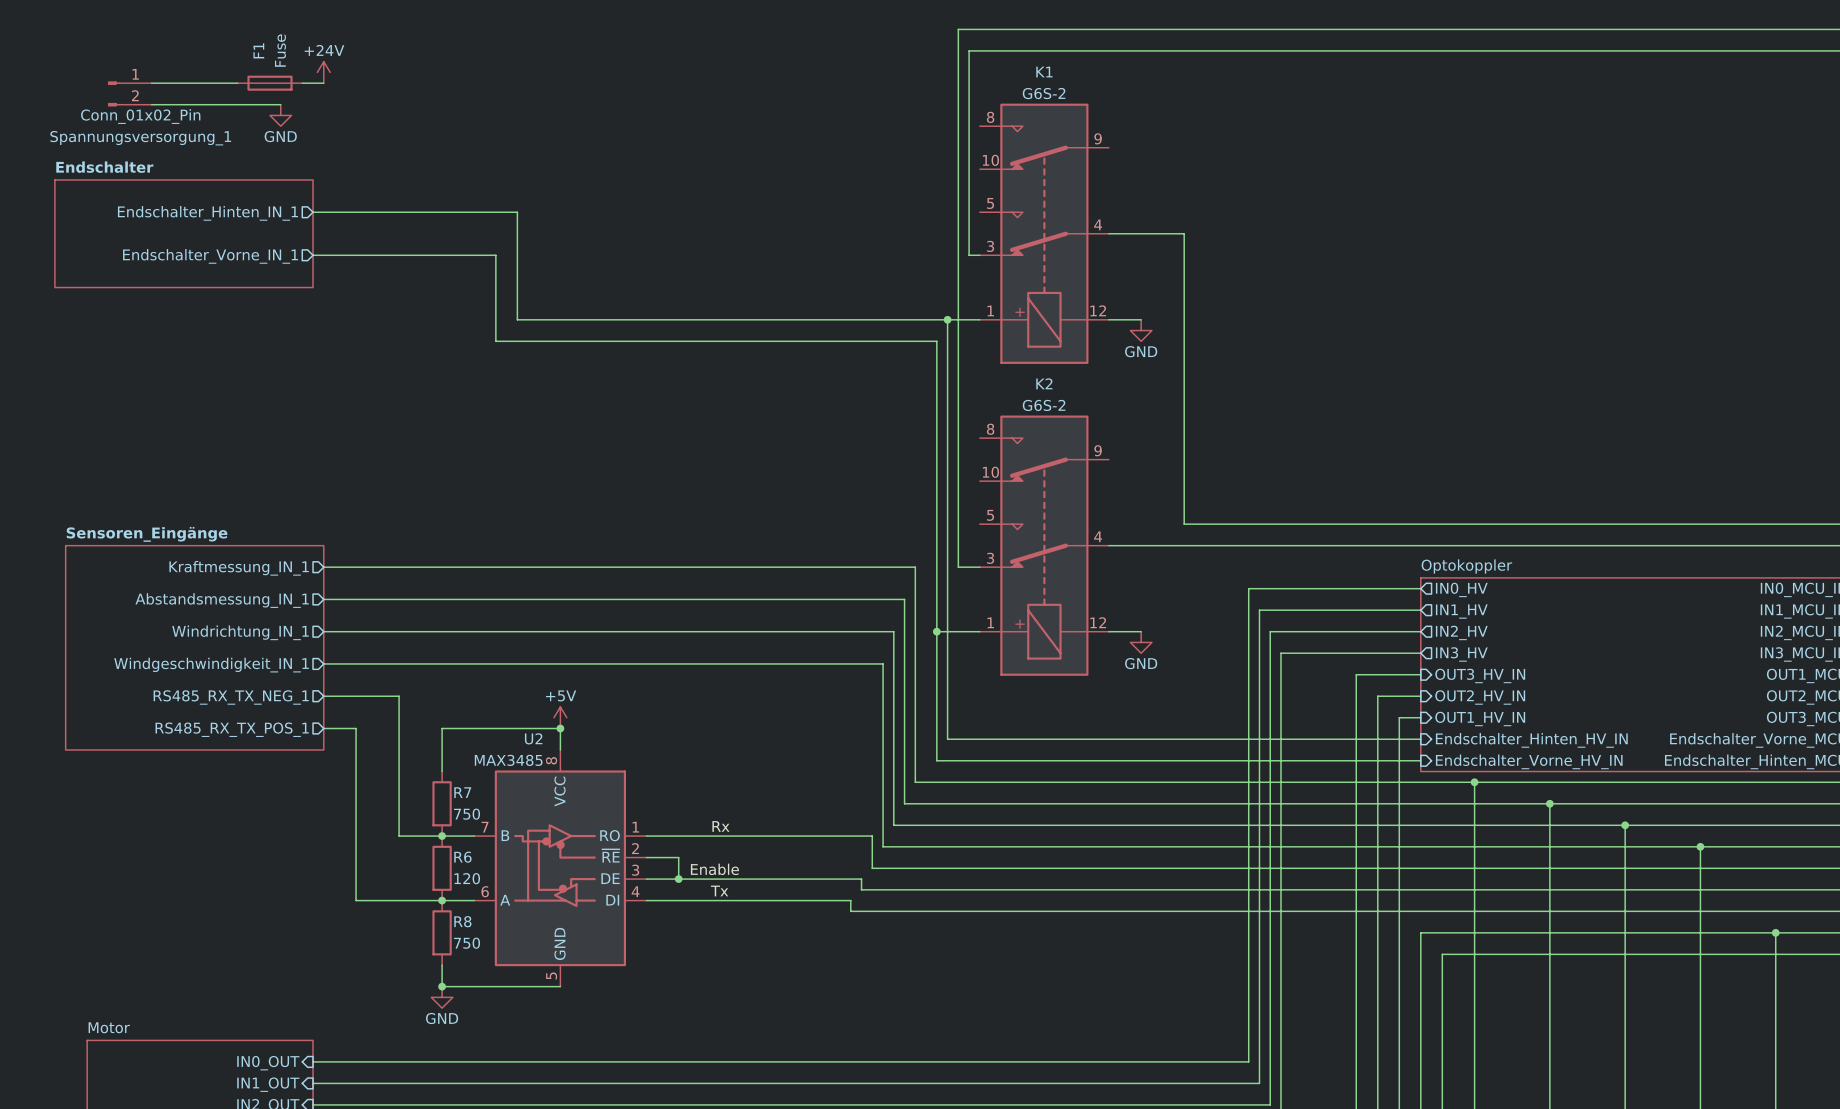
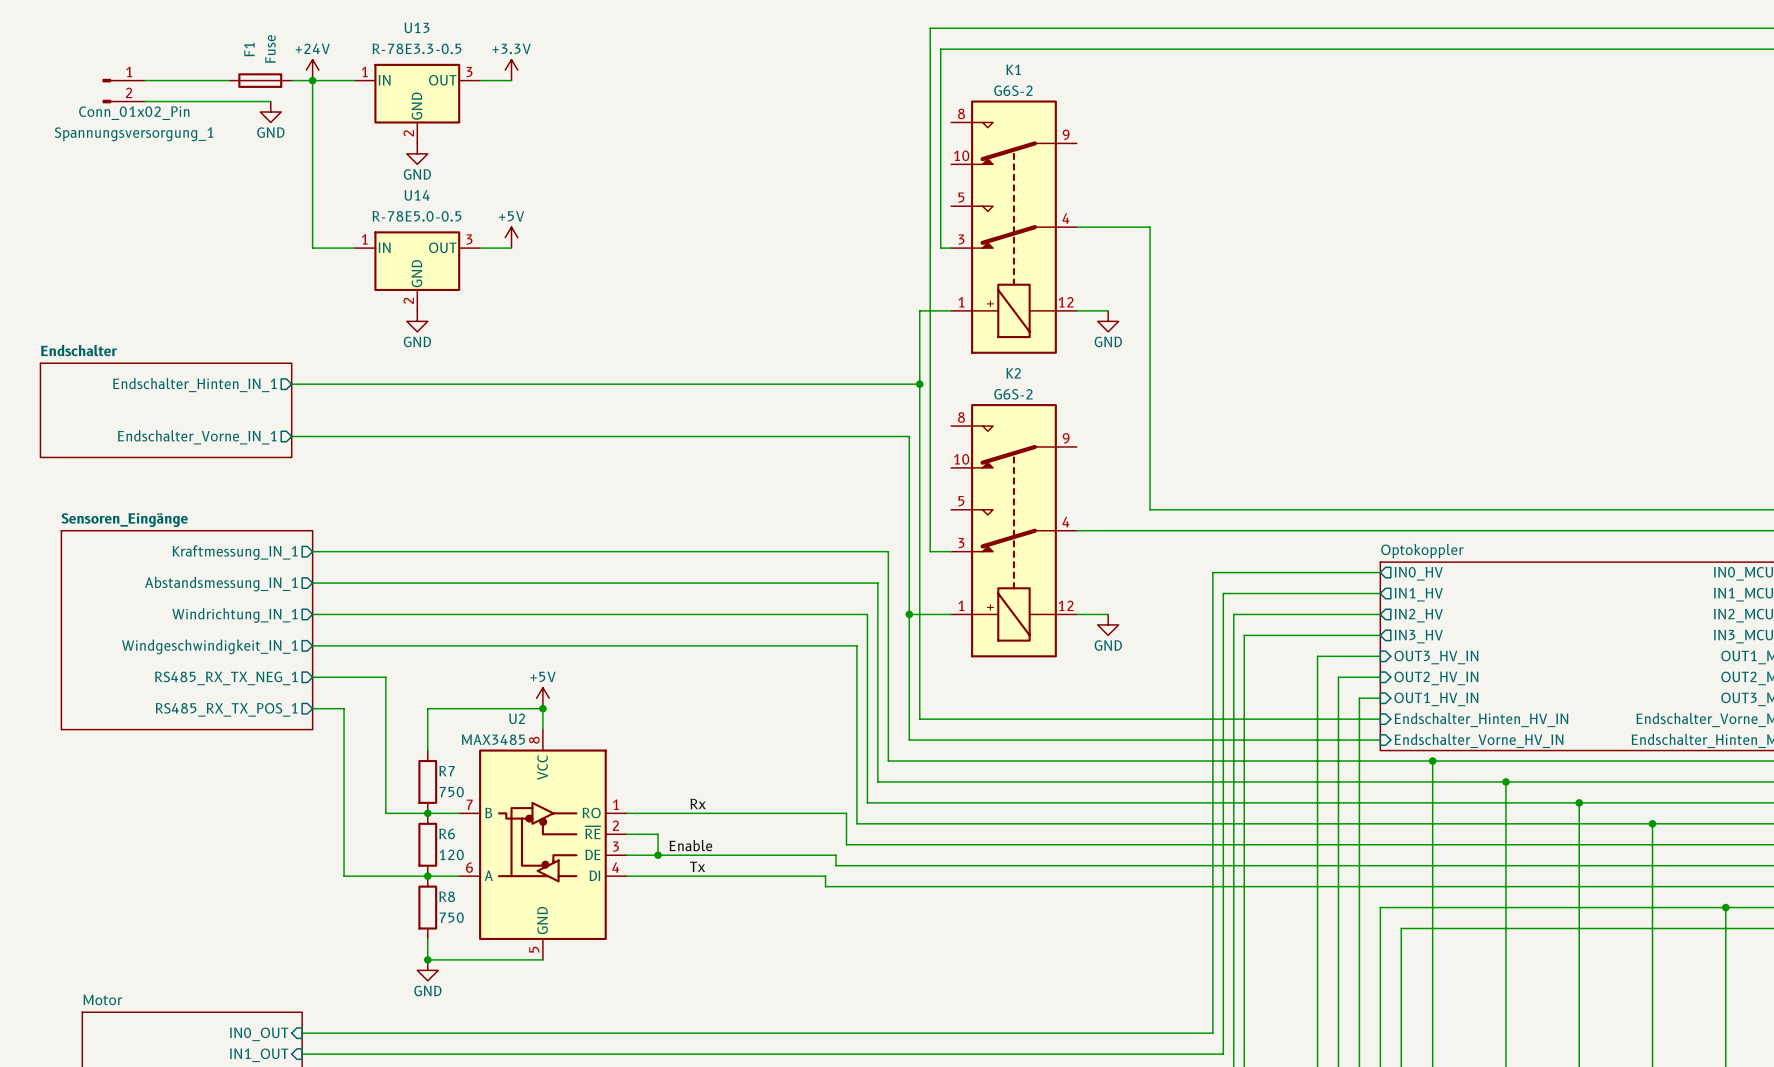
power symbol: none -> +3.3V (511, 70)
junction: none -> (312, 80)
wire: none -> (480, 80) (511, 80)
U13: none -> R-78E3.3-0.5 (417, 103)
power symbol: none -> GND (417, 153)
wire: (313, 212) (517, 212) (517, 319) (947, 319) -> none
sheet pin position: Endschalter_Hinten_IN_1 (207, 213) -> Endschalter_Hinten_IN_1 (194, 385)
sheet Endschalter: (183, 233) -> none
power symbol: none -> +5V (511, 237)
wire: (313, 255) (323, 255) -> (354, 80) (312, 80) (312, 248)
wire: (366, 255) (495, 255) (495, 341) (936, 341) (936, 448) -> (291, 436) (909, 436)
wire: none -> (480, 248) (511, 248)
sheet pin position: Endschalter_Vorne_IN_1 (210, 256) -> Endschalter_Vorne_IN_1 (197, 437)
U14: none -> R-78E5.0-0.5 (417, 271)
junction: (947, 319) -> none
power symbol: none -> GND (417, 321)
wire: none -> (291, 384) (919, 384)
junction: none -> (919, 384)
sheet Endschalter: none -> (166, 410)

